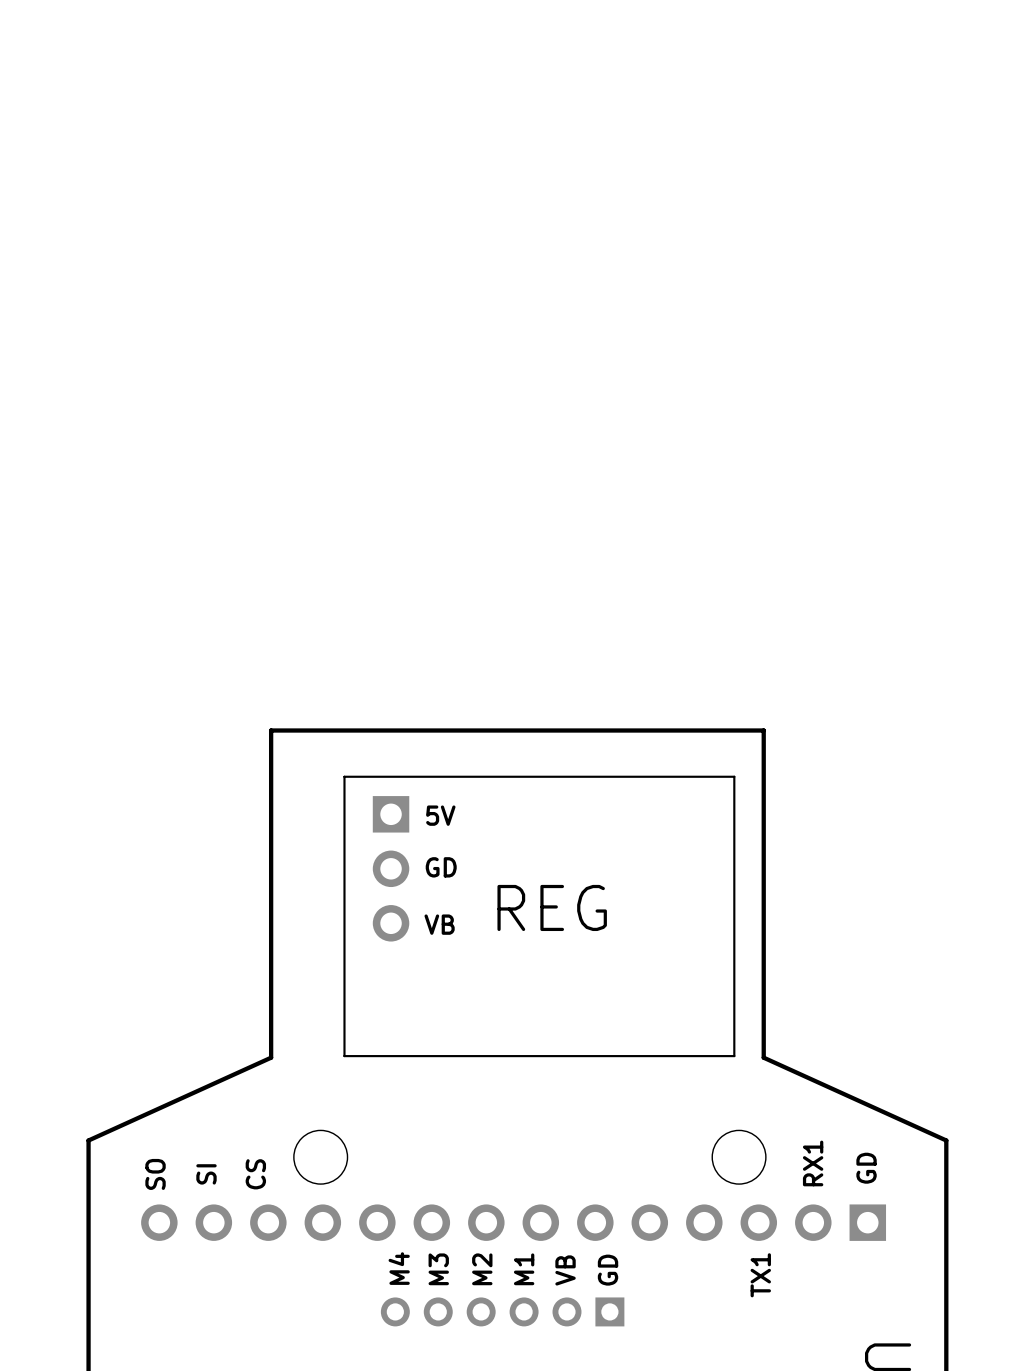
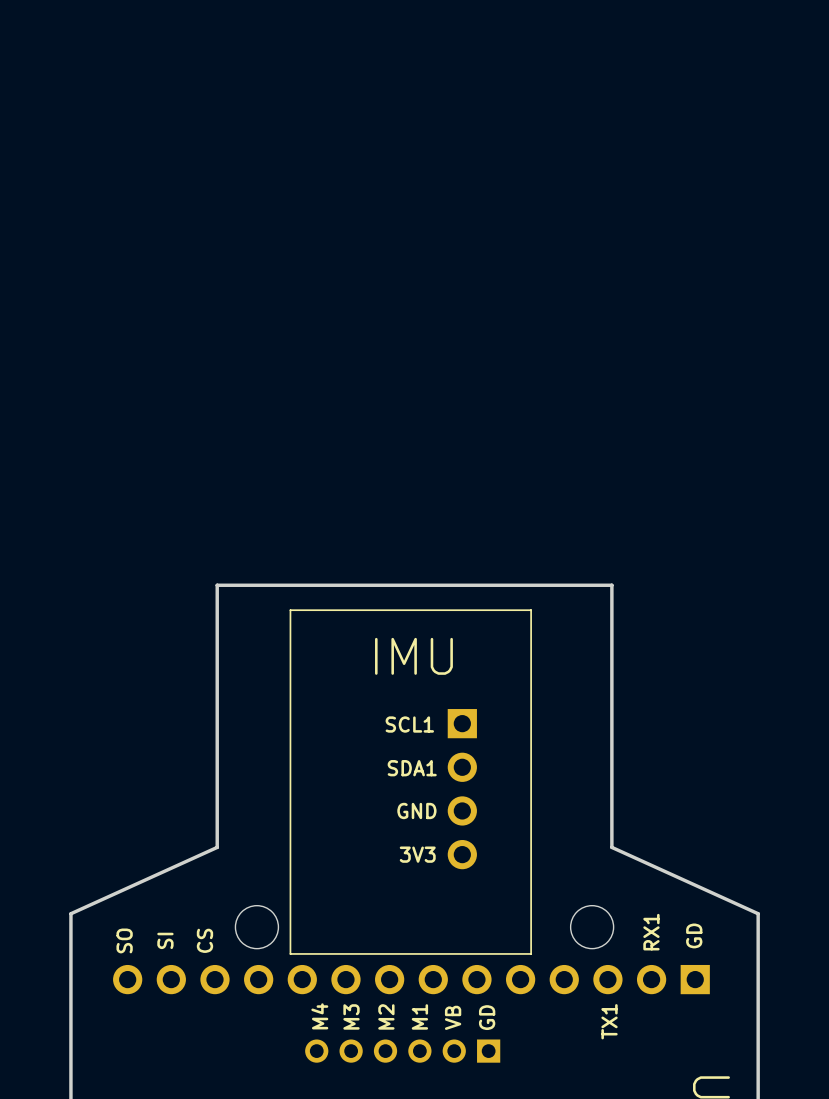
line: (344, 776) (734, 776) (734, 1056) (344, 1056) (344, 776) -> (290, 610) (290, 953) (531, 953) (531, 610) (290, 610)
text: 5V (440, 815) -> none
text: none -> IMU (413, 656)
text: GD (441, 867) -> none
part: (391, 868) -> none
text: none -> SCL1 (409, 724)
text: REG (552, 907) -> none
text: VB (439, 924) -> none
text: none -> SDA1 (412, 768)
part: none -> (462, 789)
text: none -> GND (416, 810)
text: none -> 3V3 (417, 854)

